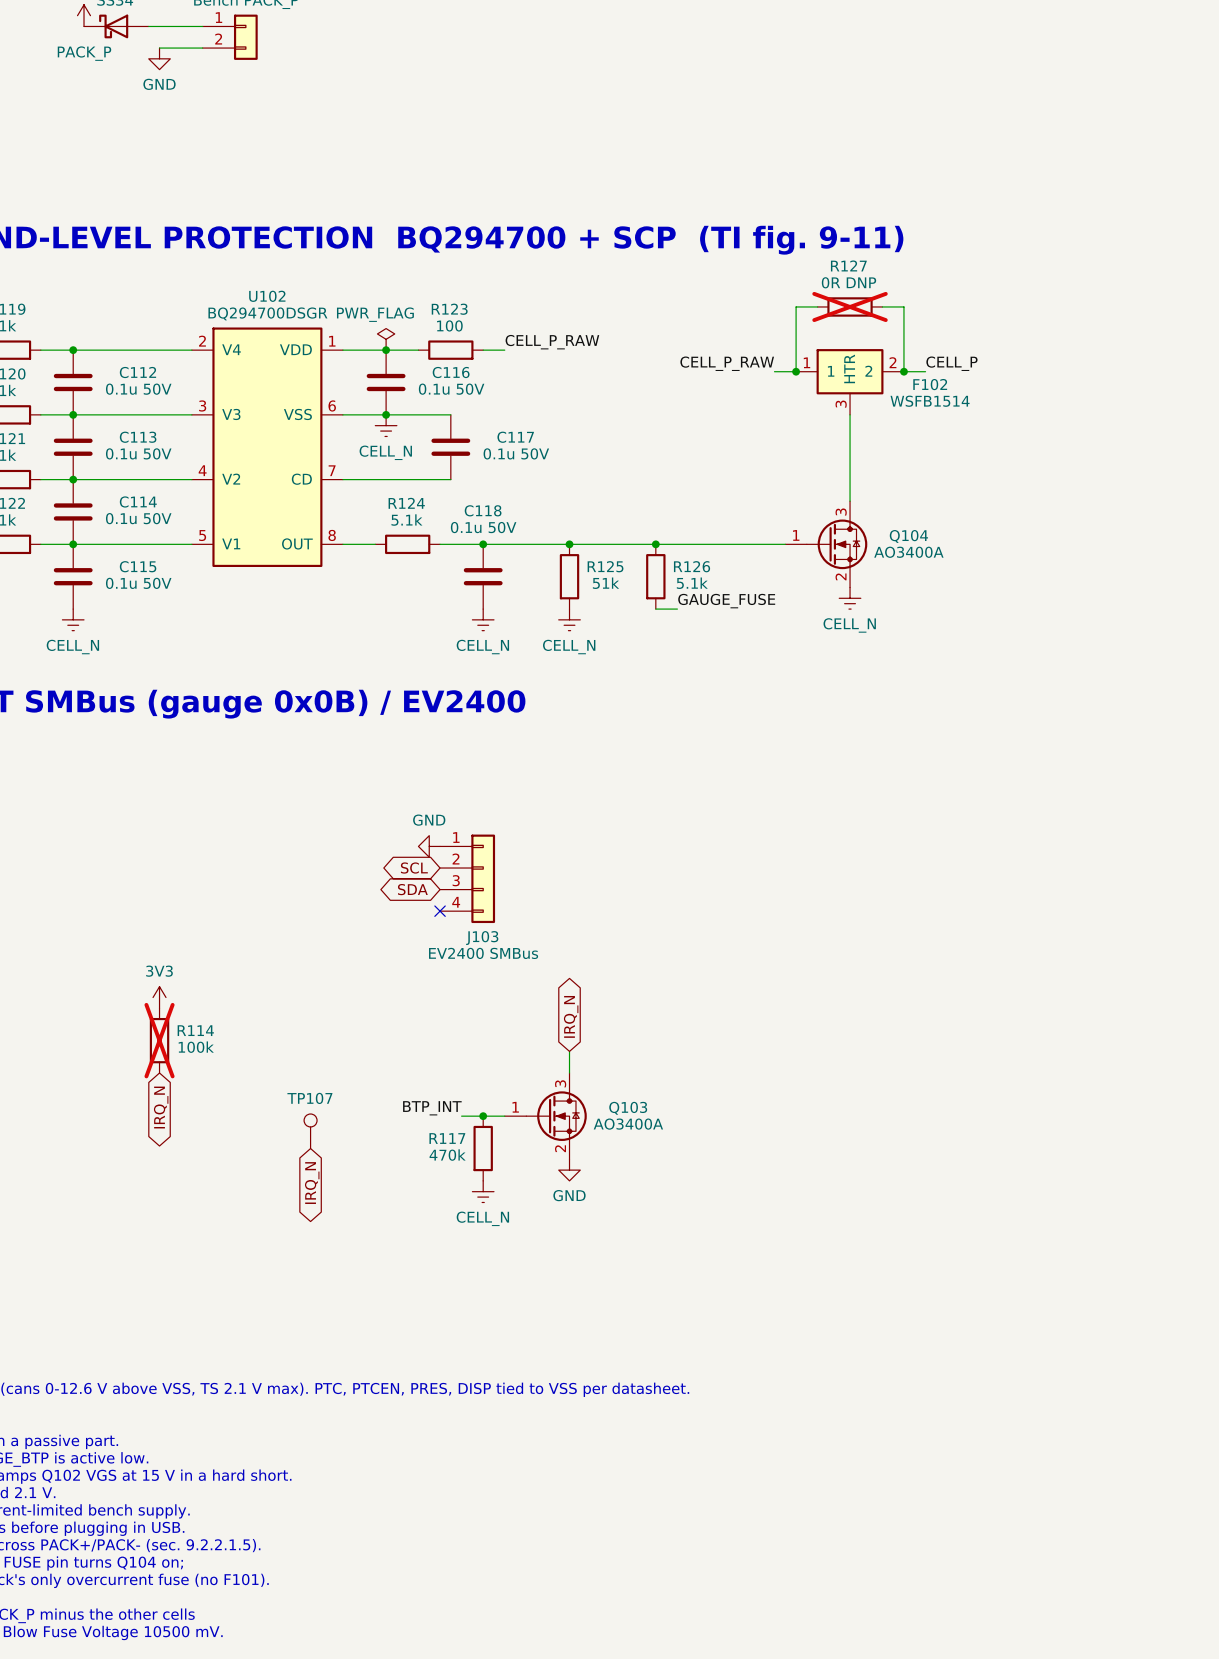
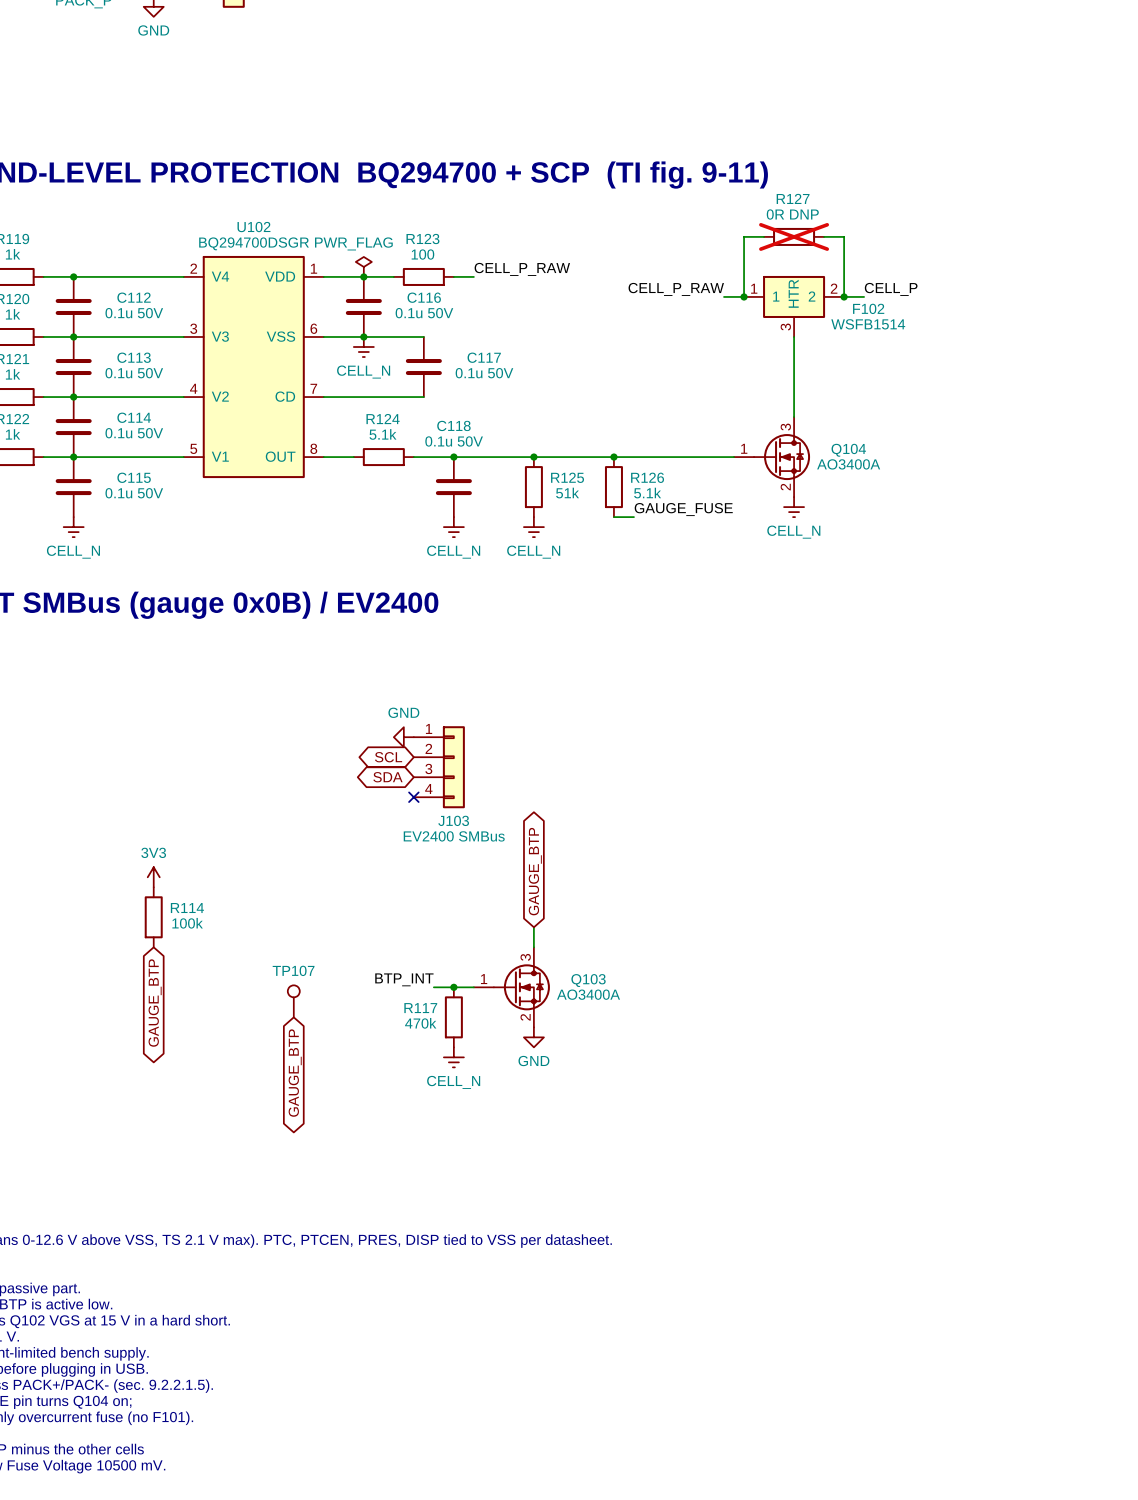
global label: IRQ_N (571, 1016) -> GAUGE_BTP (535, 871)
R114 do-not-place cross: (159, 1040) -> none
global label: IRQ_N (161, 1107) -> GAUGE_BTP (155, 1003)
global label: IRQ_N (312, 1183) -> GAUGE_BTP (295, 1073)

